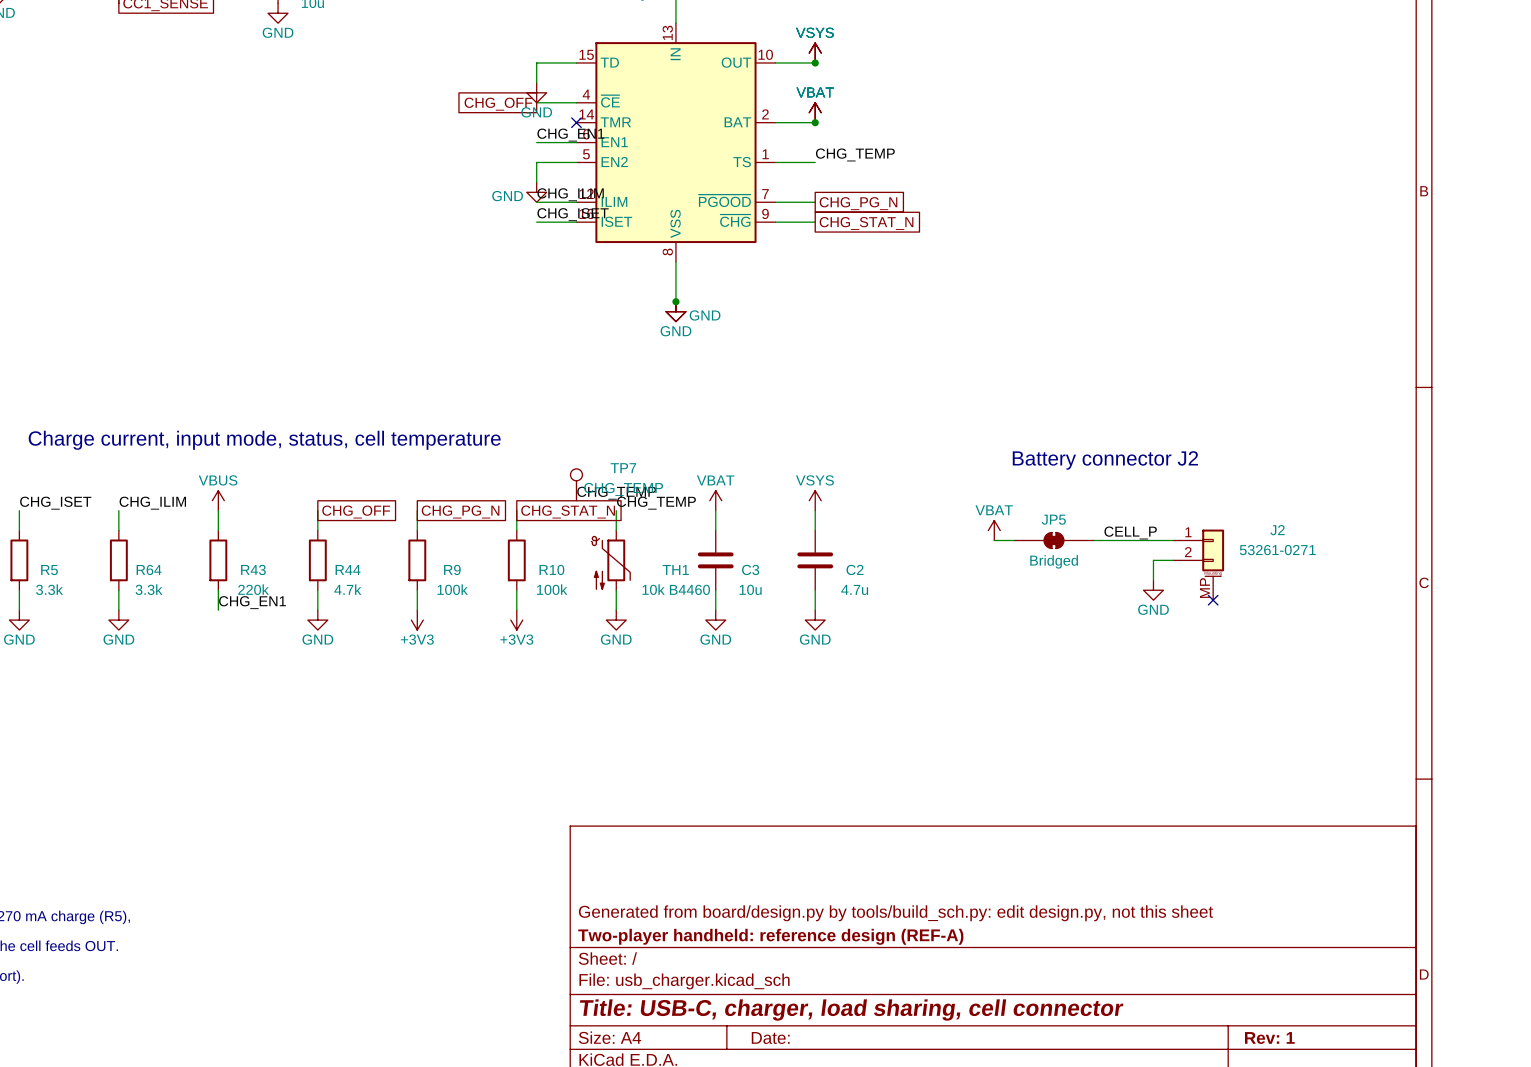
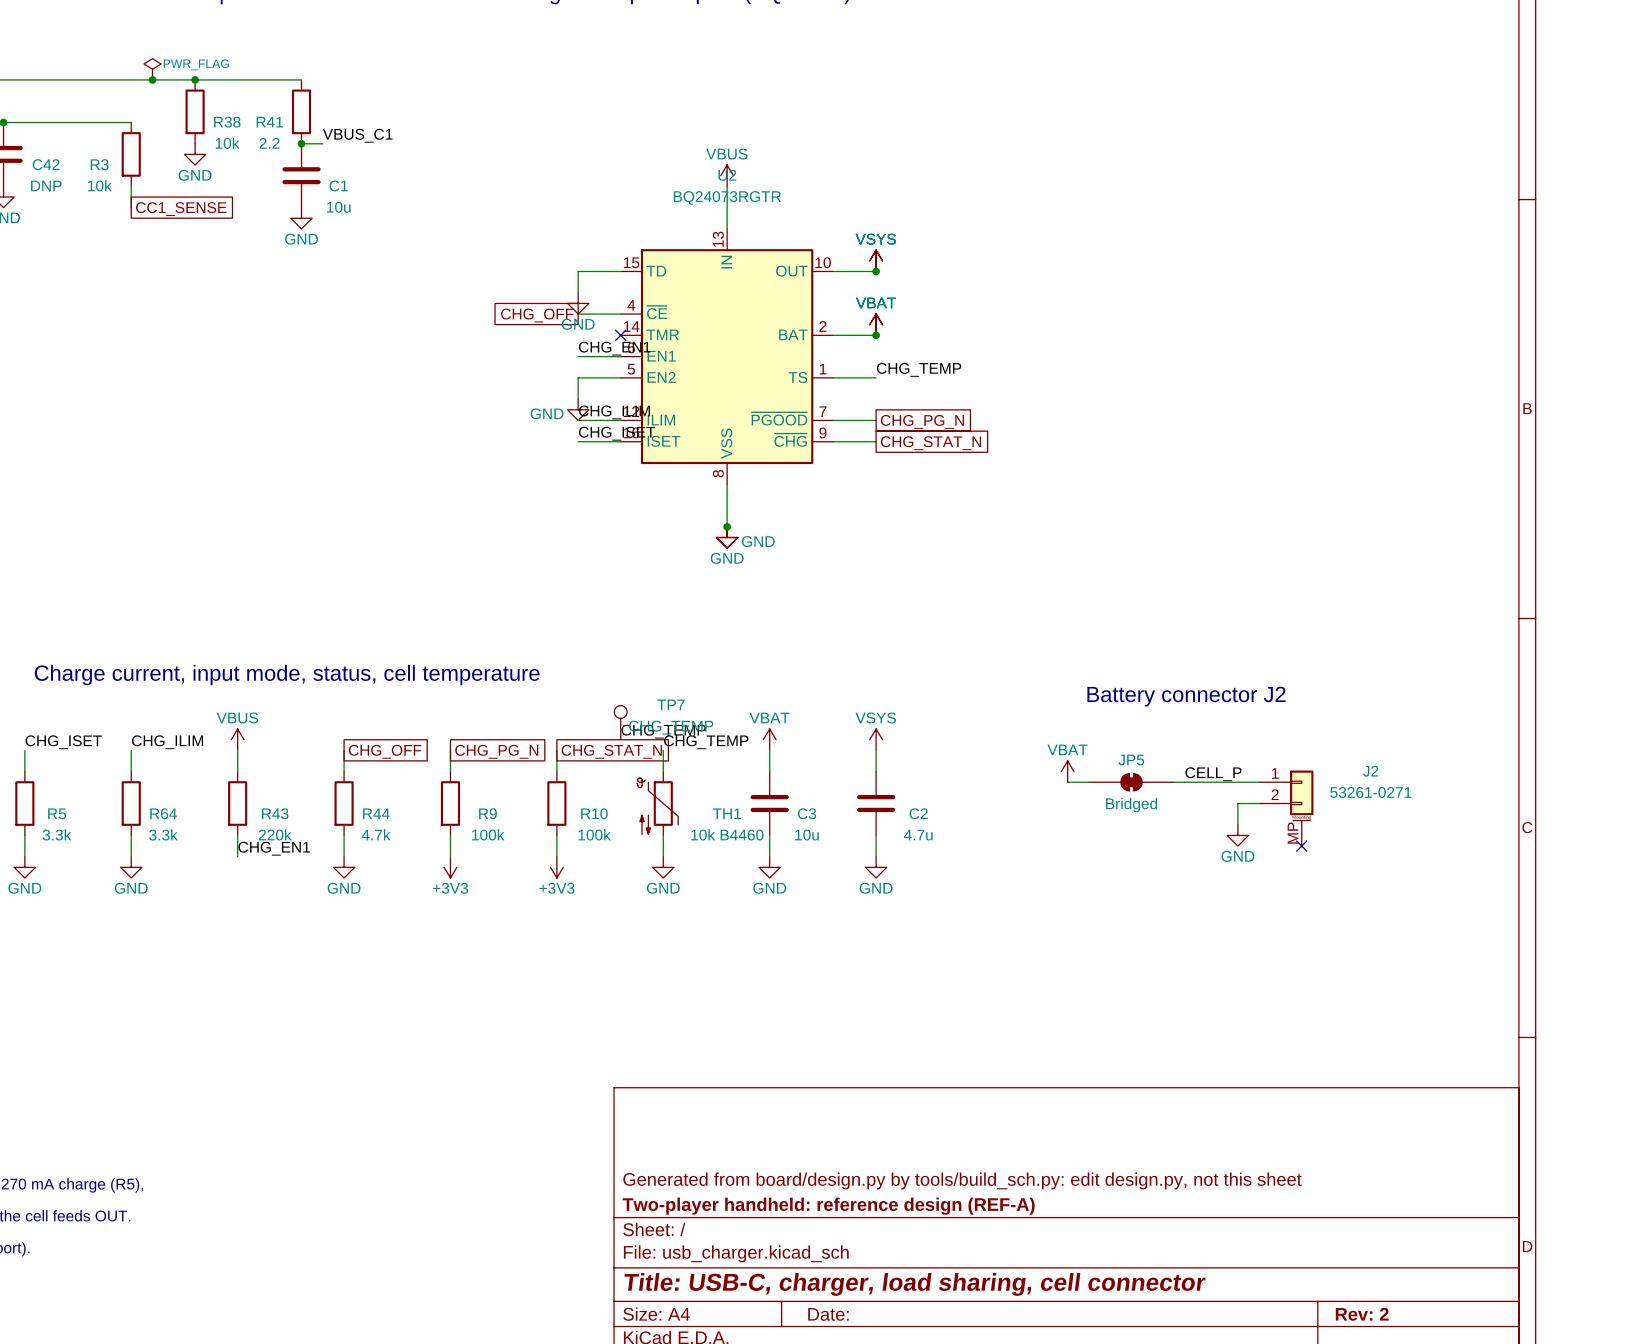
title block: Rev: 1 (1269, 1038) -> Rev: 2 (1362, 1314)

